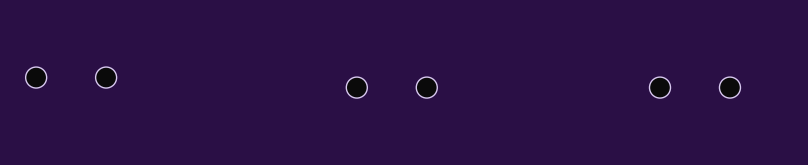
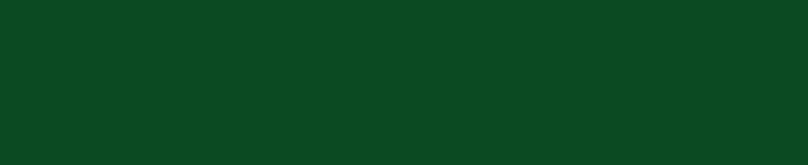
part: (71, 77) -> none
part: (391, 87) -> none
part: (694, 87) -> none

